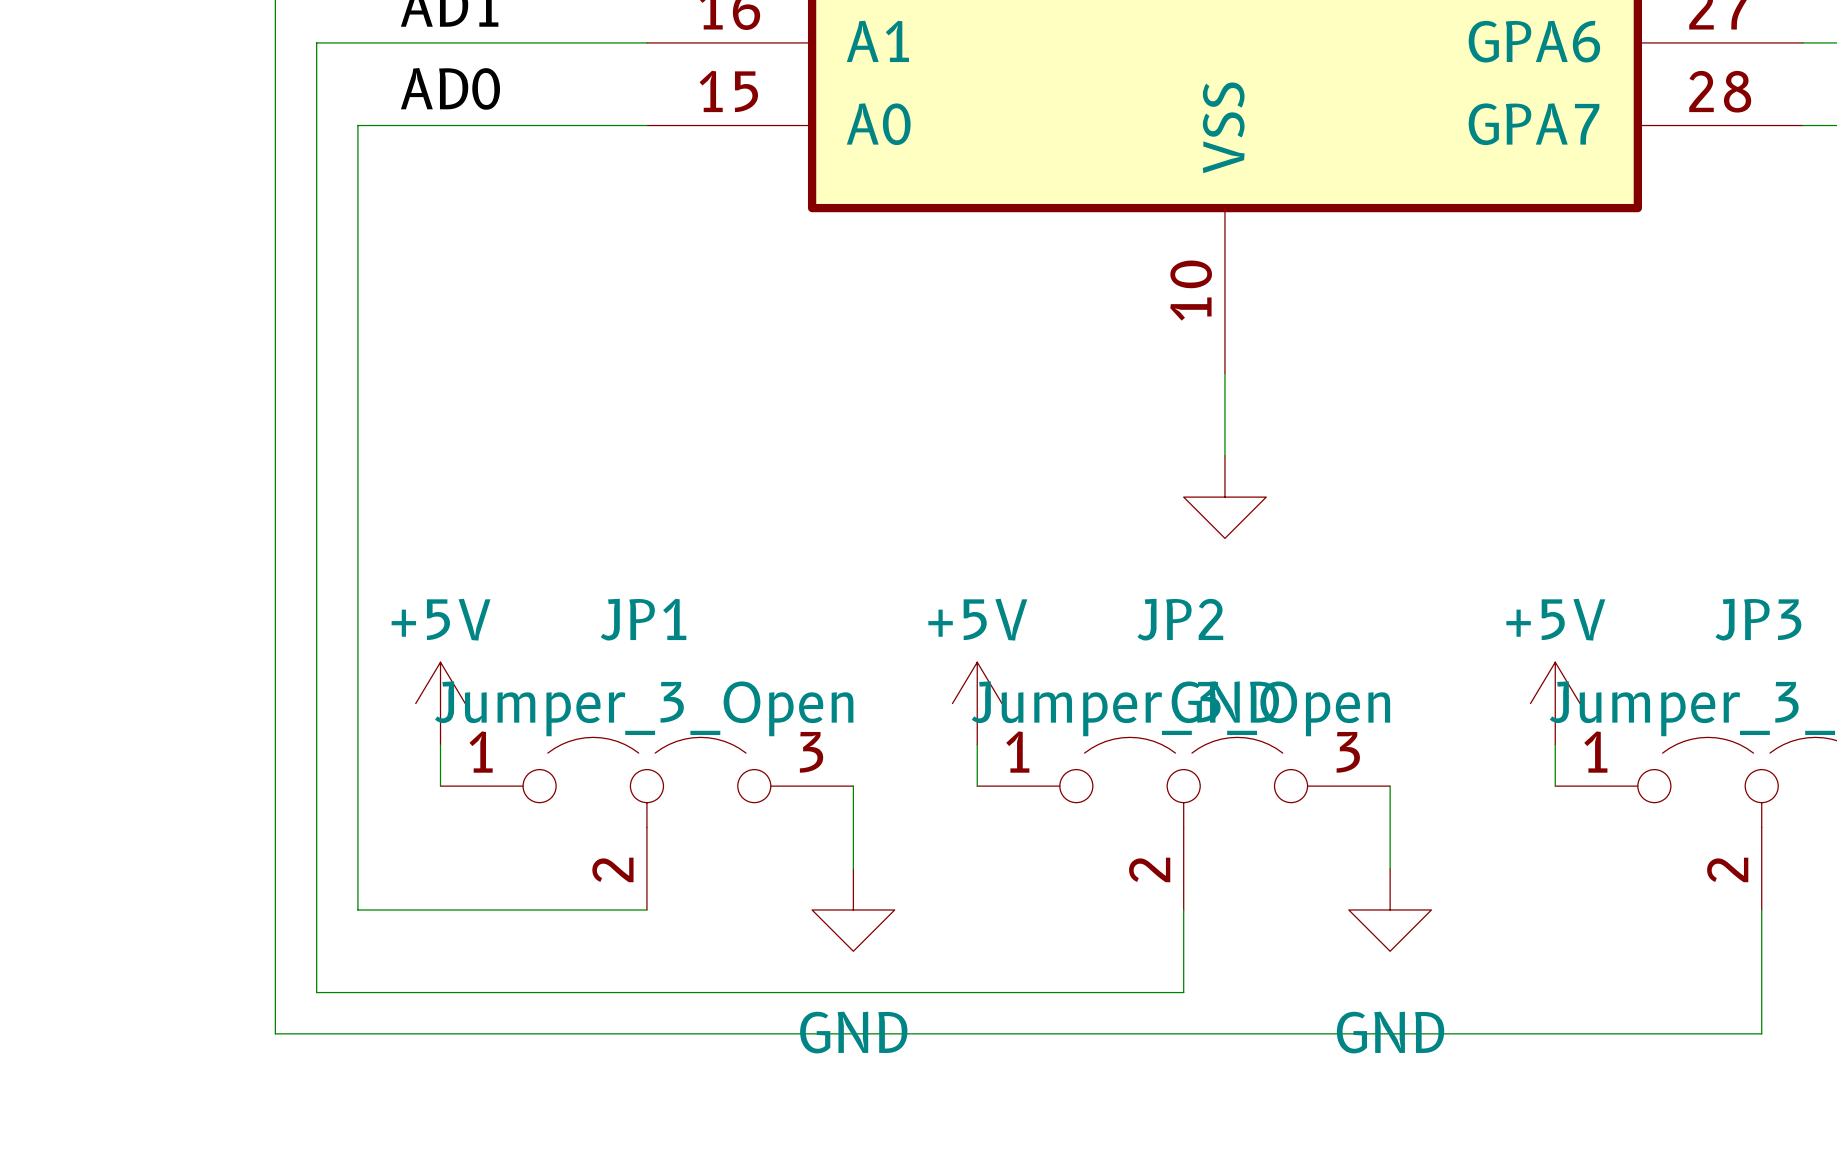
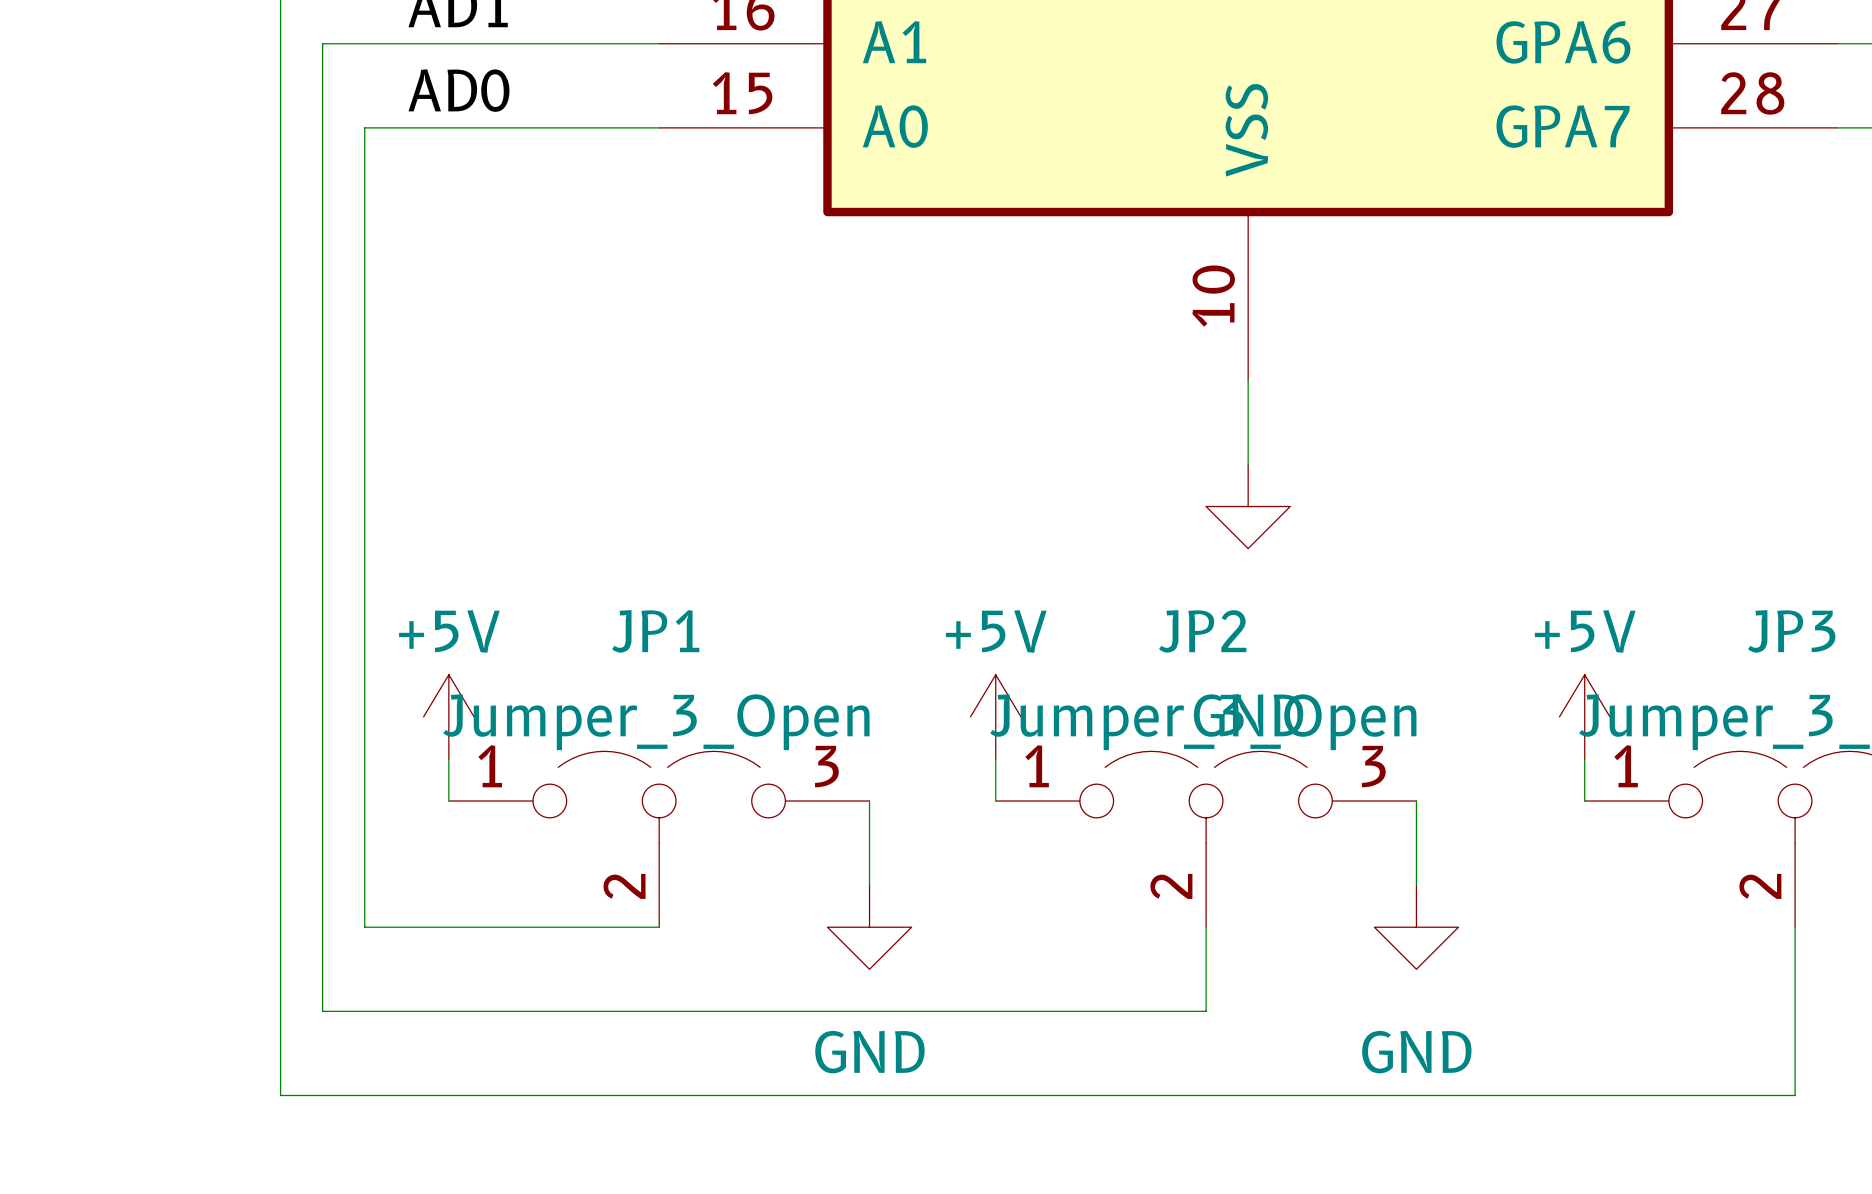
wire: (275, 1033) (1761, 1033) -> (280, 1053) (280, 1095) (1795, 1095) (1795, 1053)

